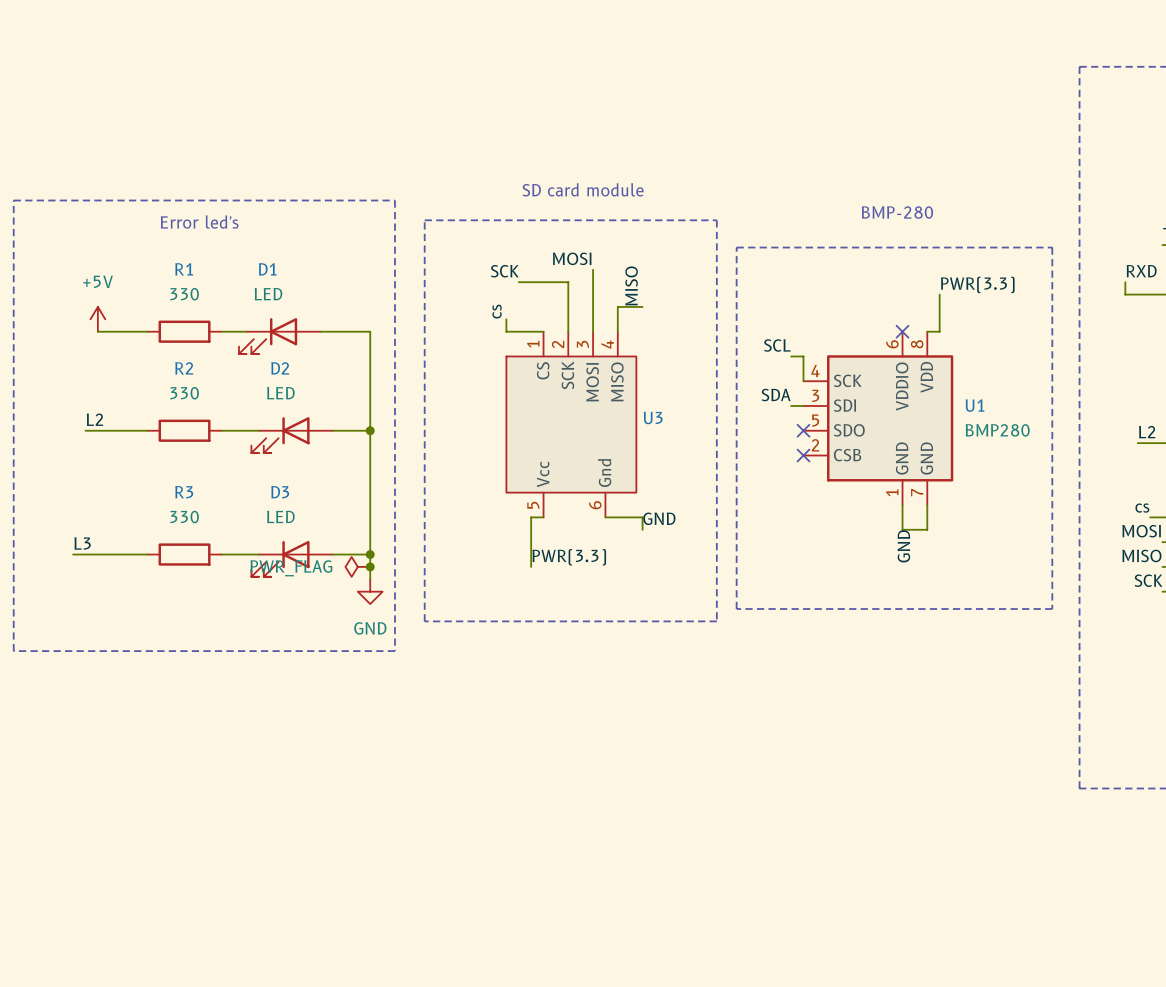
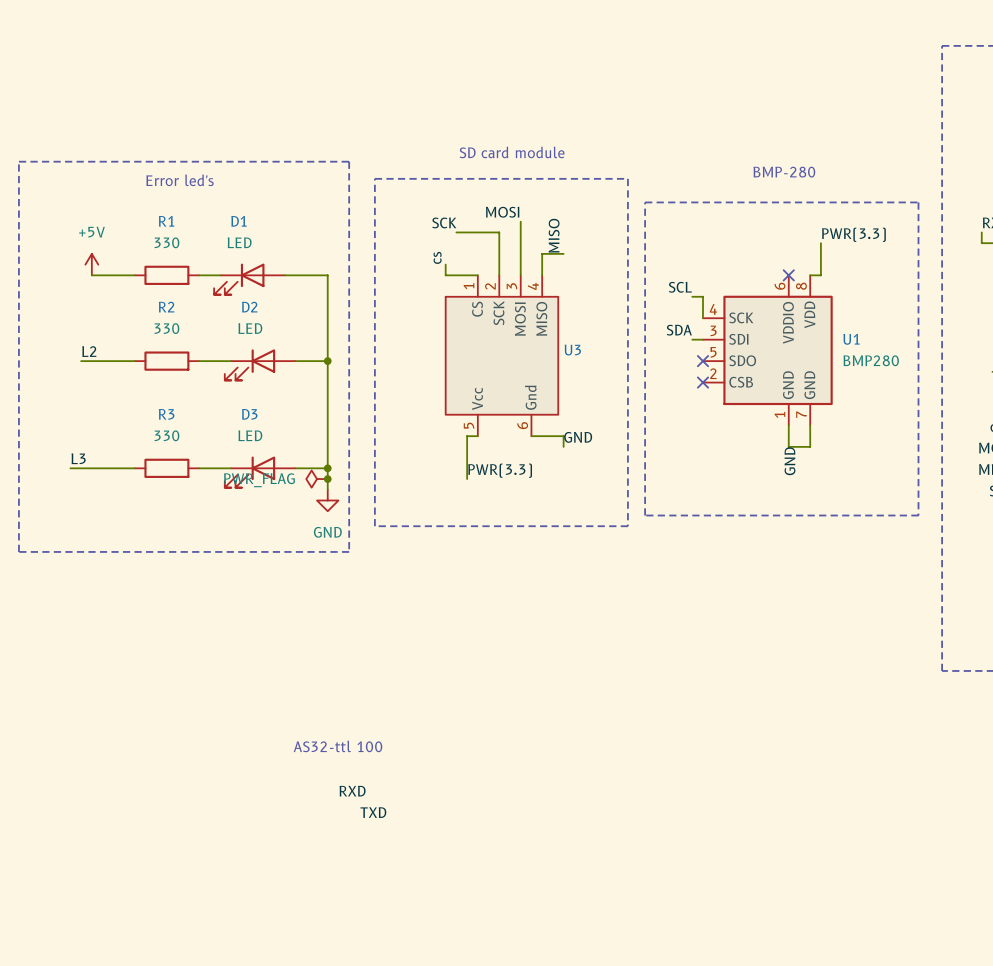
text: none -> AS32-ttl 100 (338, 746)
label: none -> RXD (352, 791)
label: none -> TXD (373, 812)

